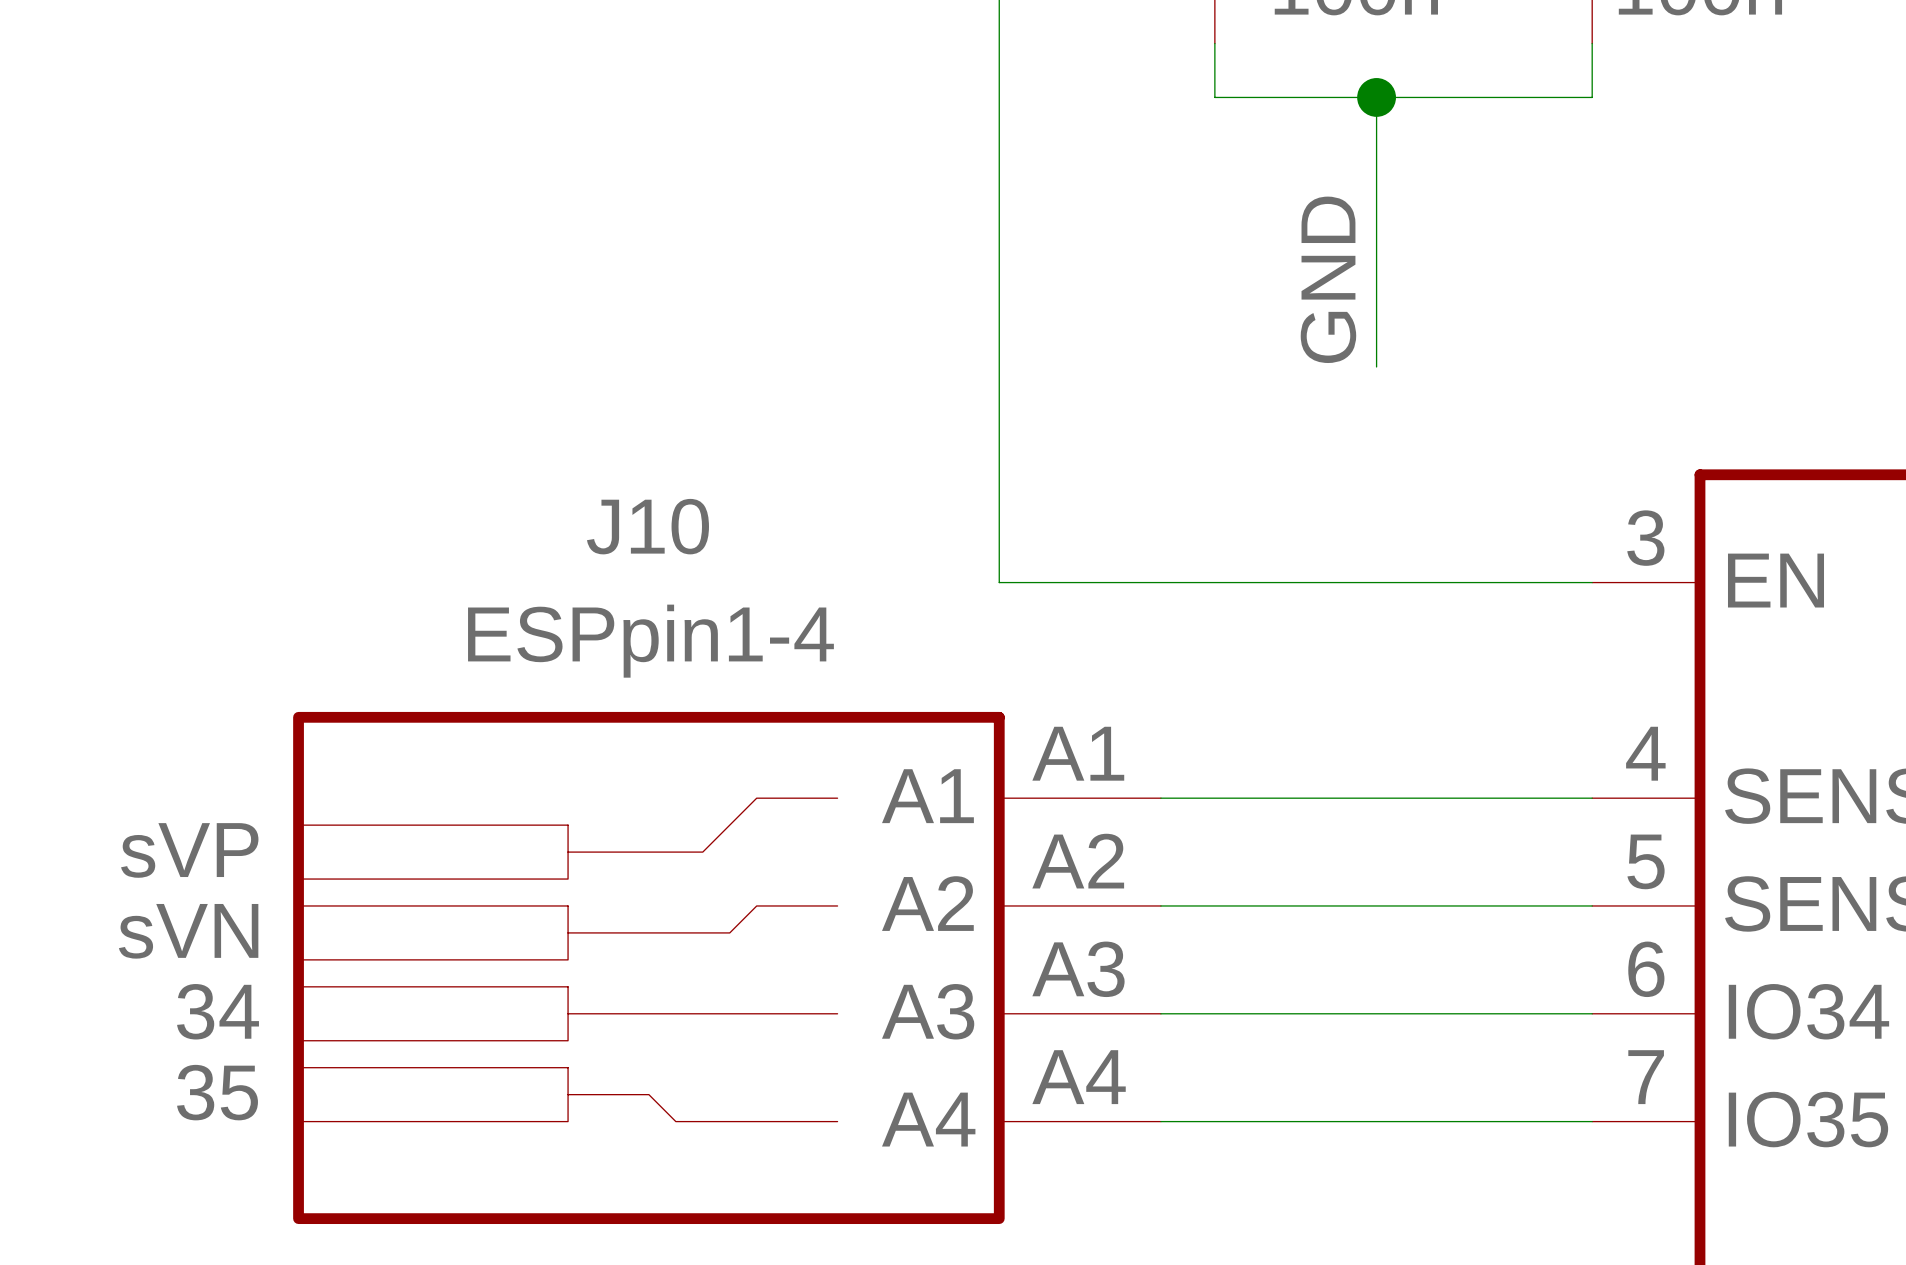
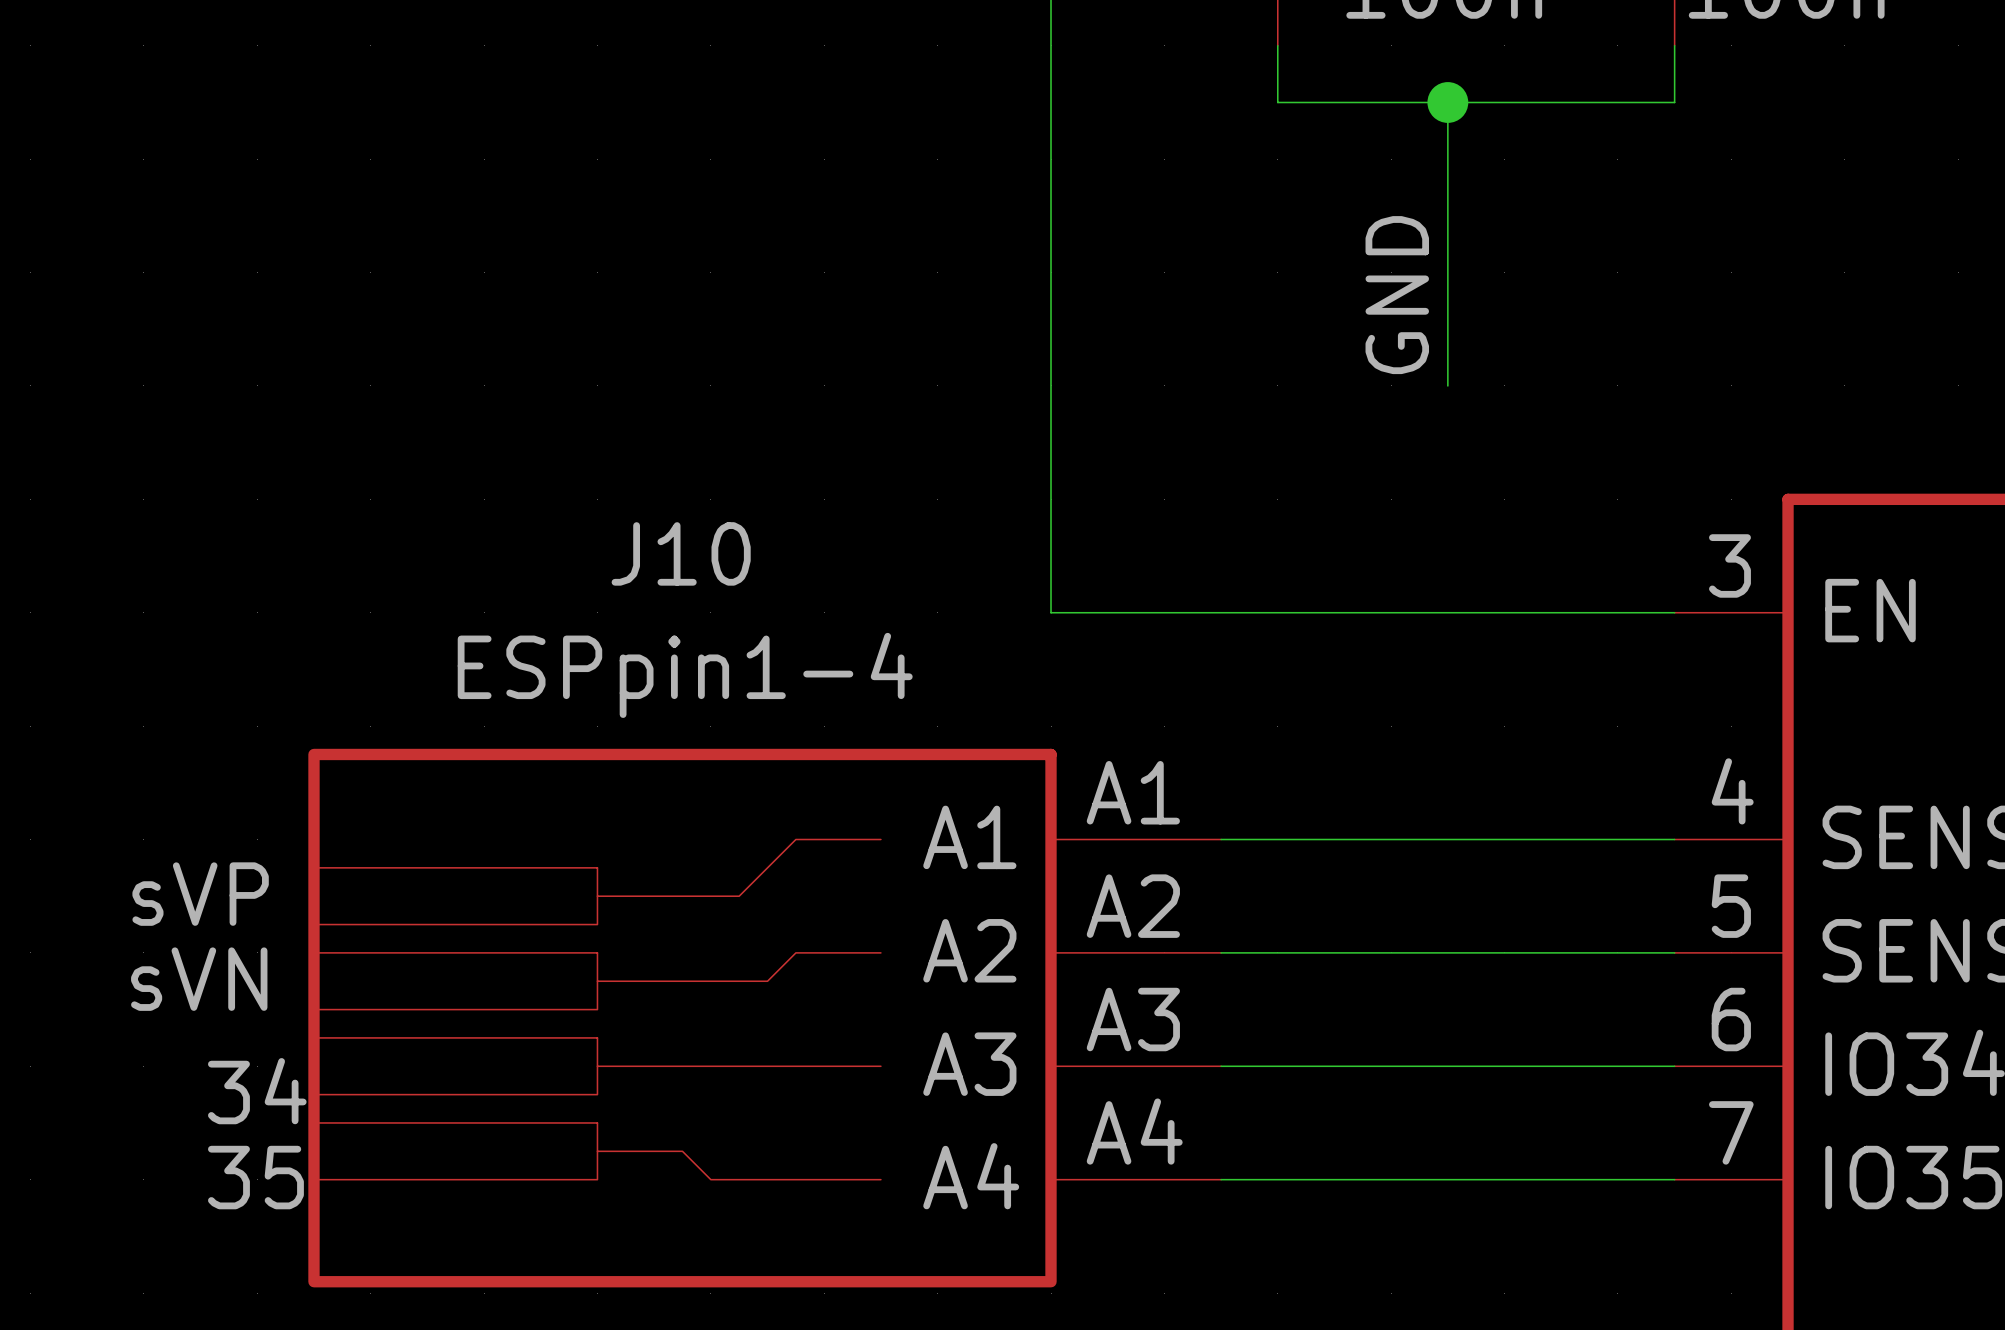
J10 text position: 34 (218, 1011) -> 34 (257, 1091)
J10 text position: 35 (217, 1092) -> 35 (255, 1177)

